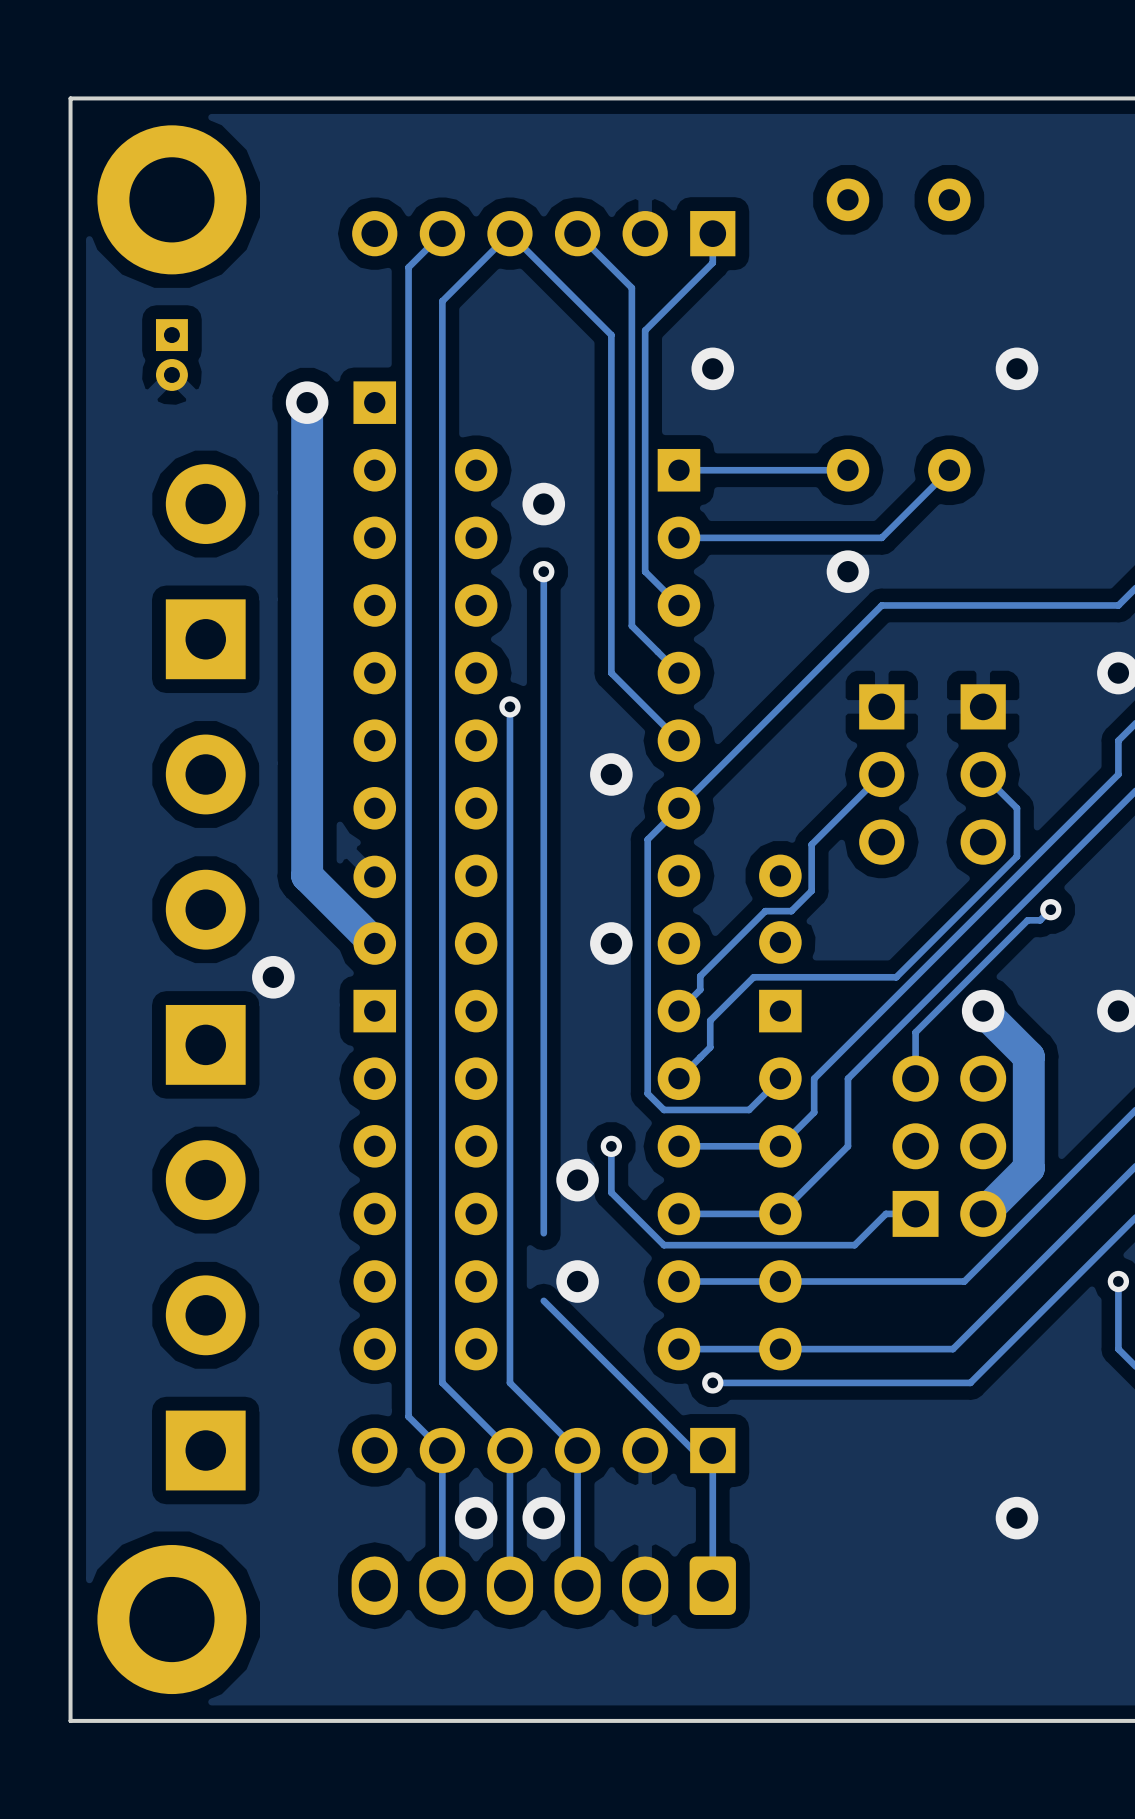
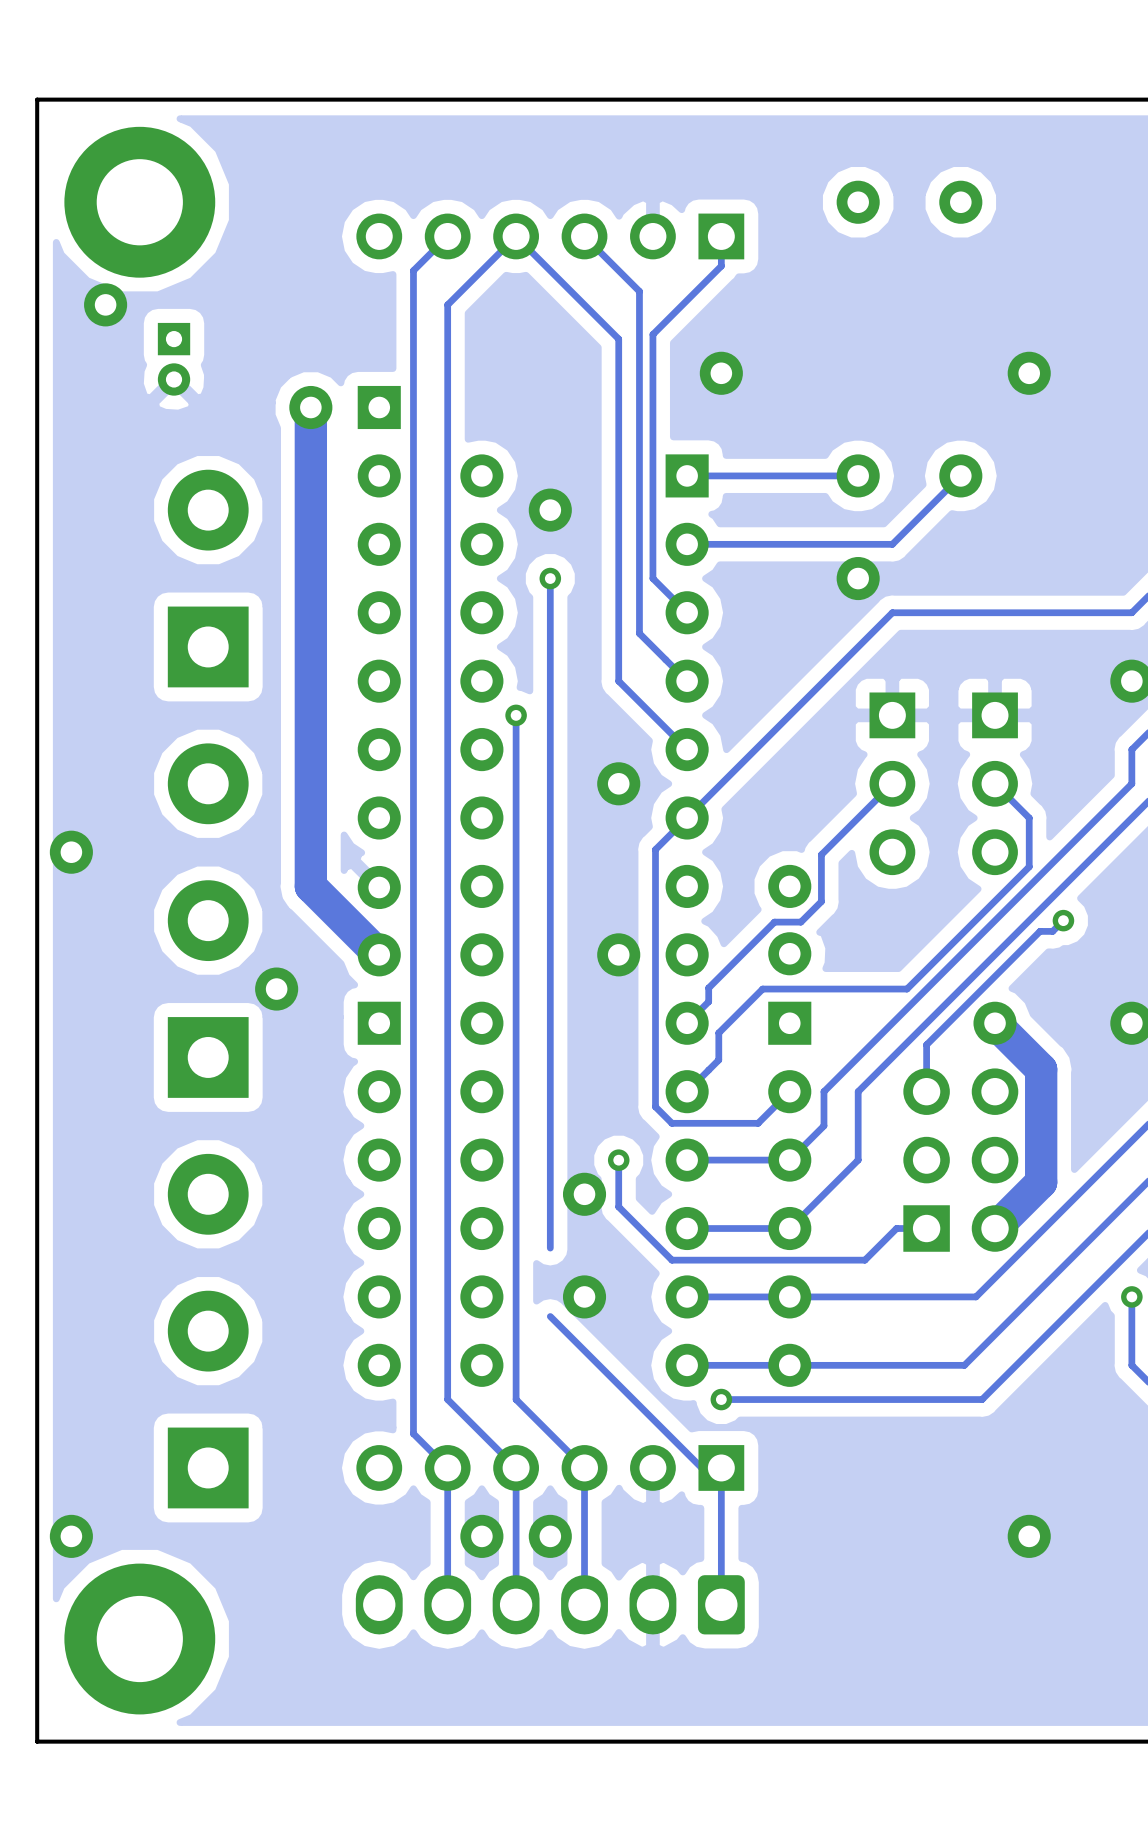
board edge: (70, 98) (70, 1720) -> (71, 99) (37, 99) (37, 1741) (71, 1741)
part position: (171, 199) -> (139, 202)
via: none -> (105, 304)
via: none -> (71, 852)
via: none -> (71, 1536)
part position: (171, 1619) -> (139, 1639)

